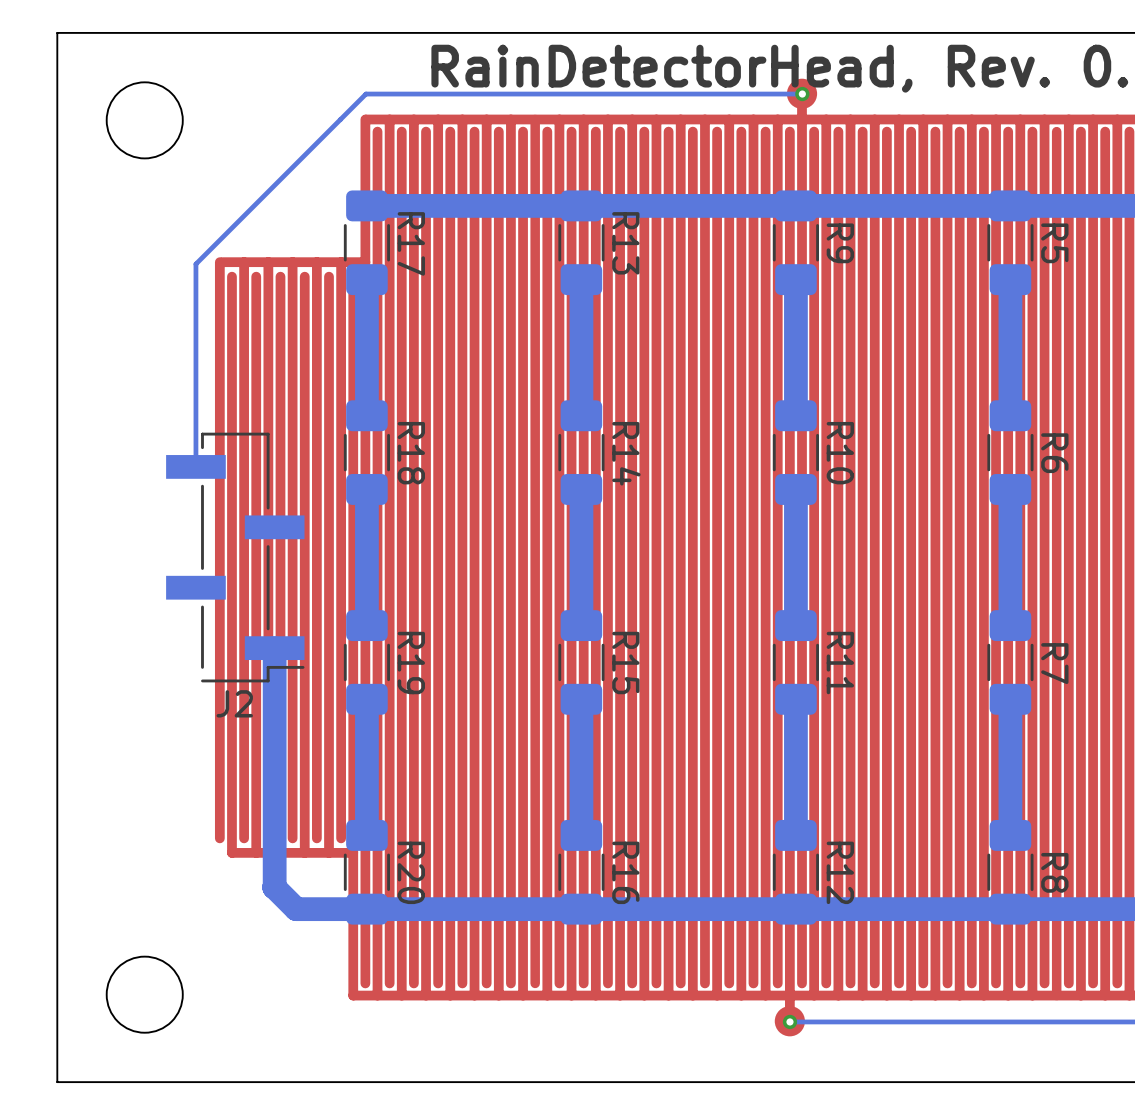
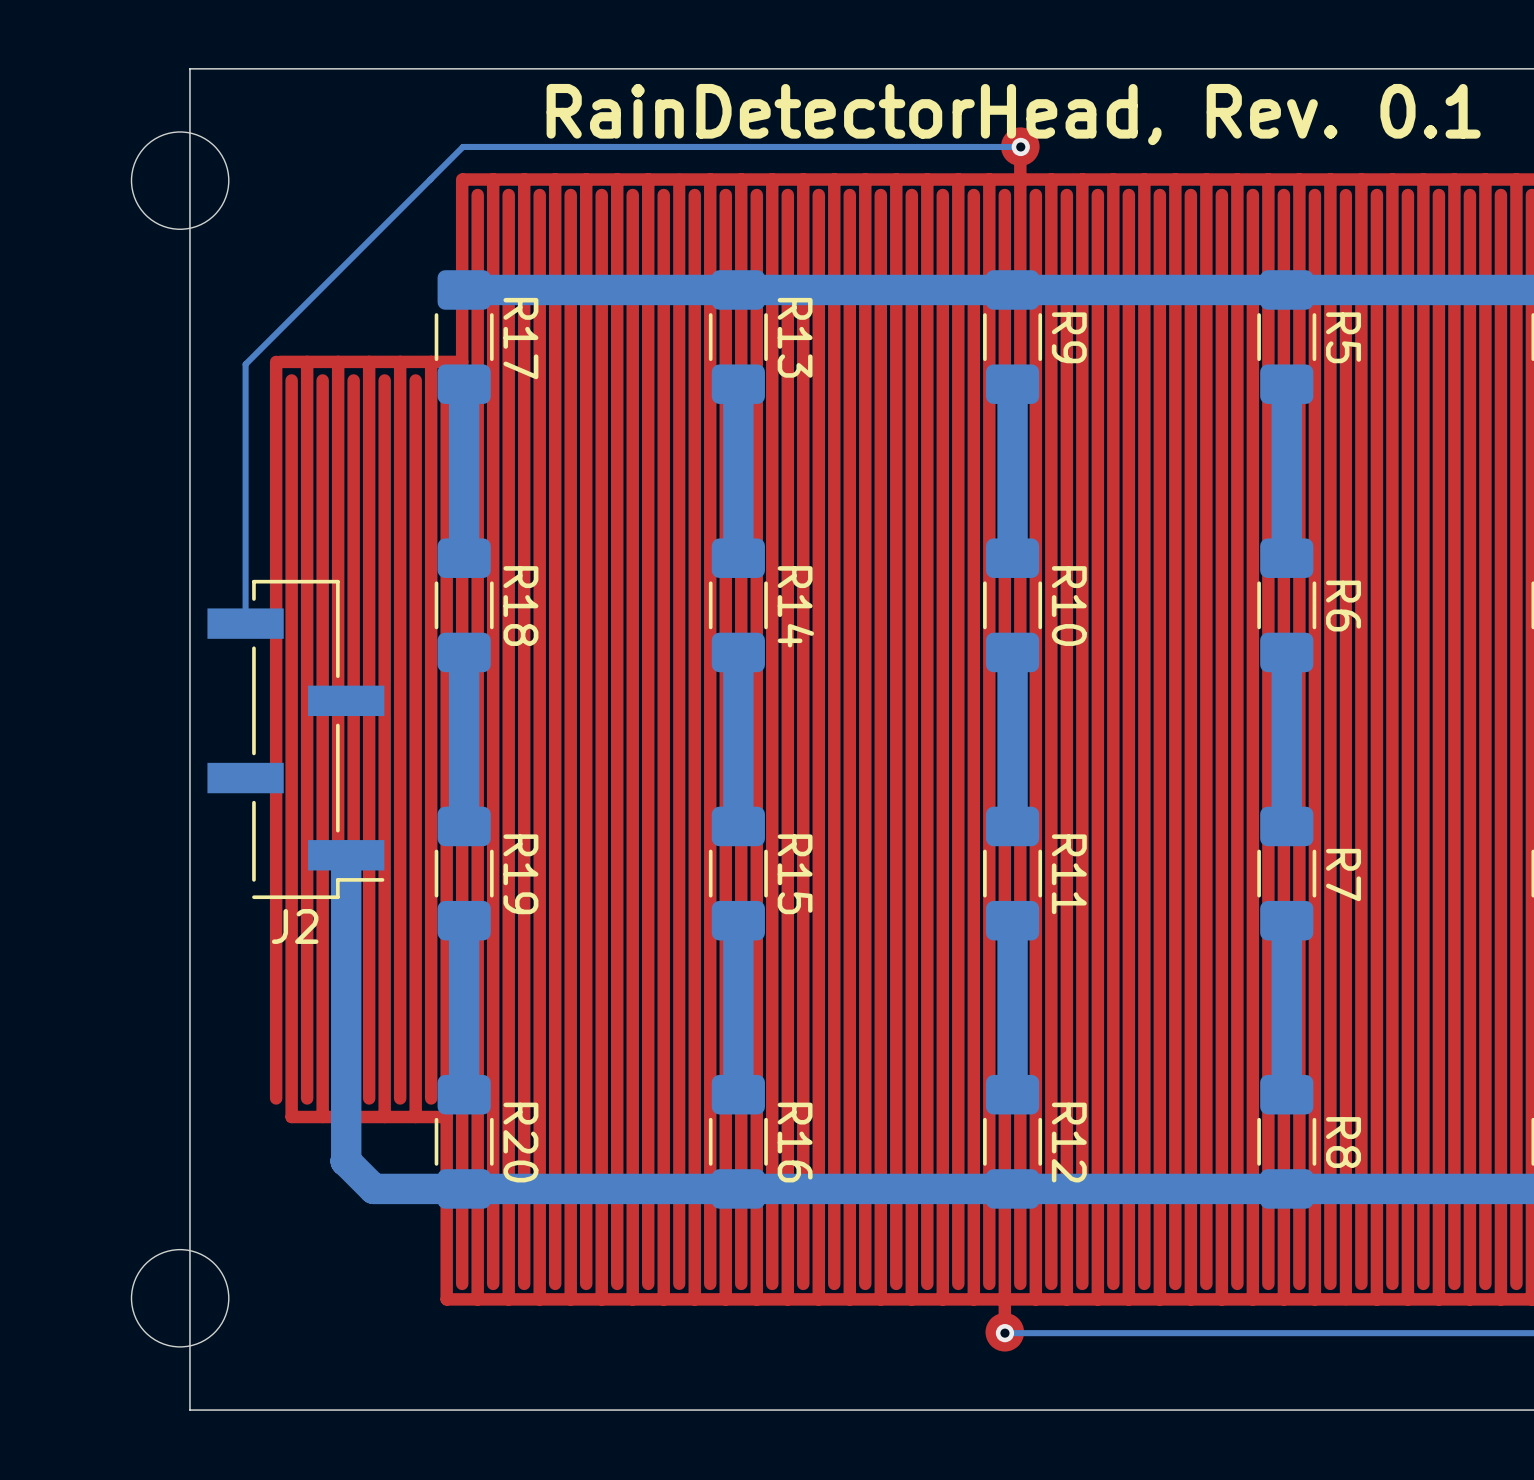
board edge: (152, 32) (57, 32) (57, 1082) (152, 1082) -> (189, 68) (189, 1410)

